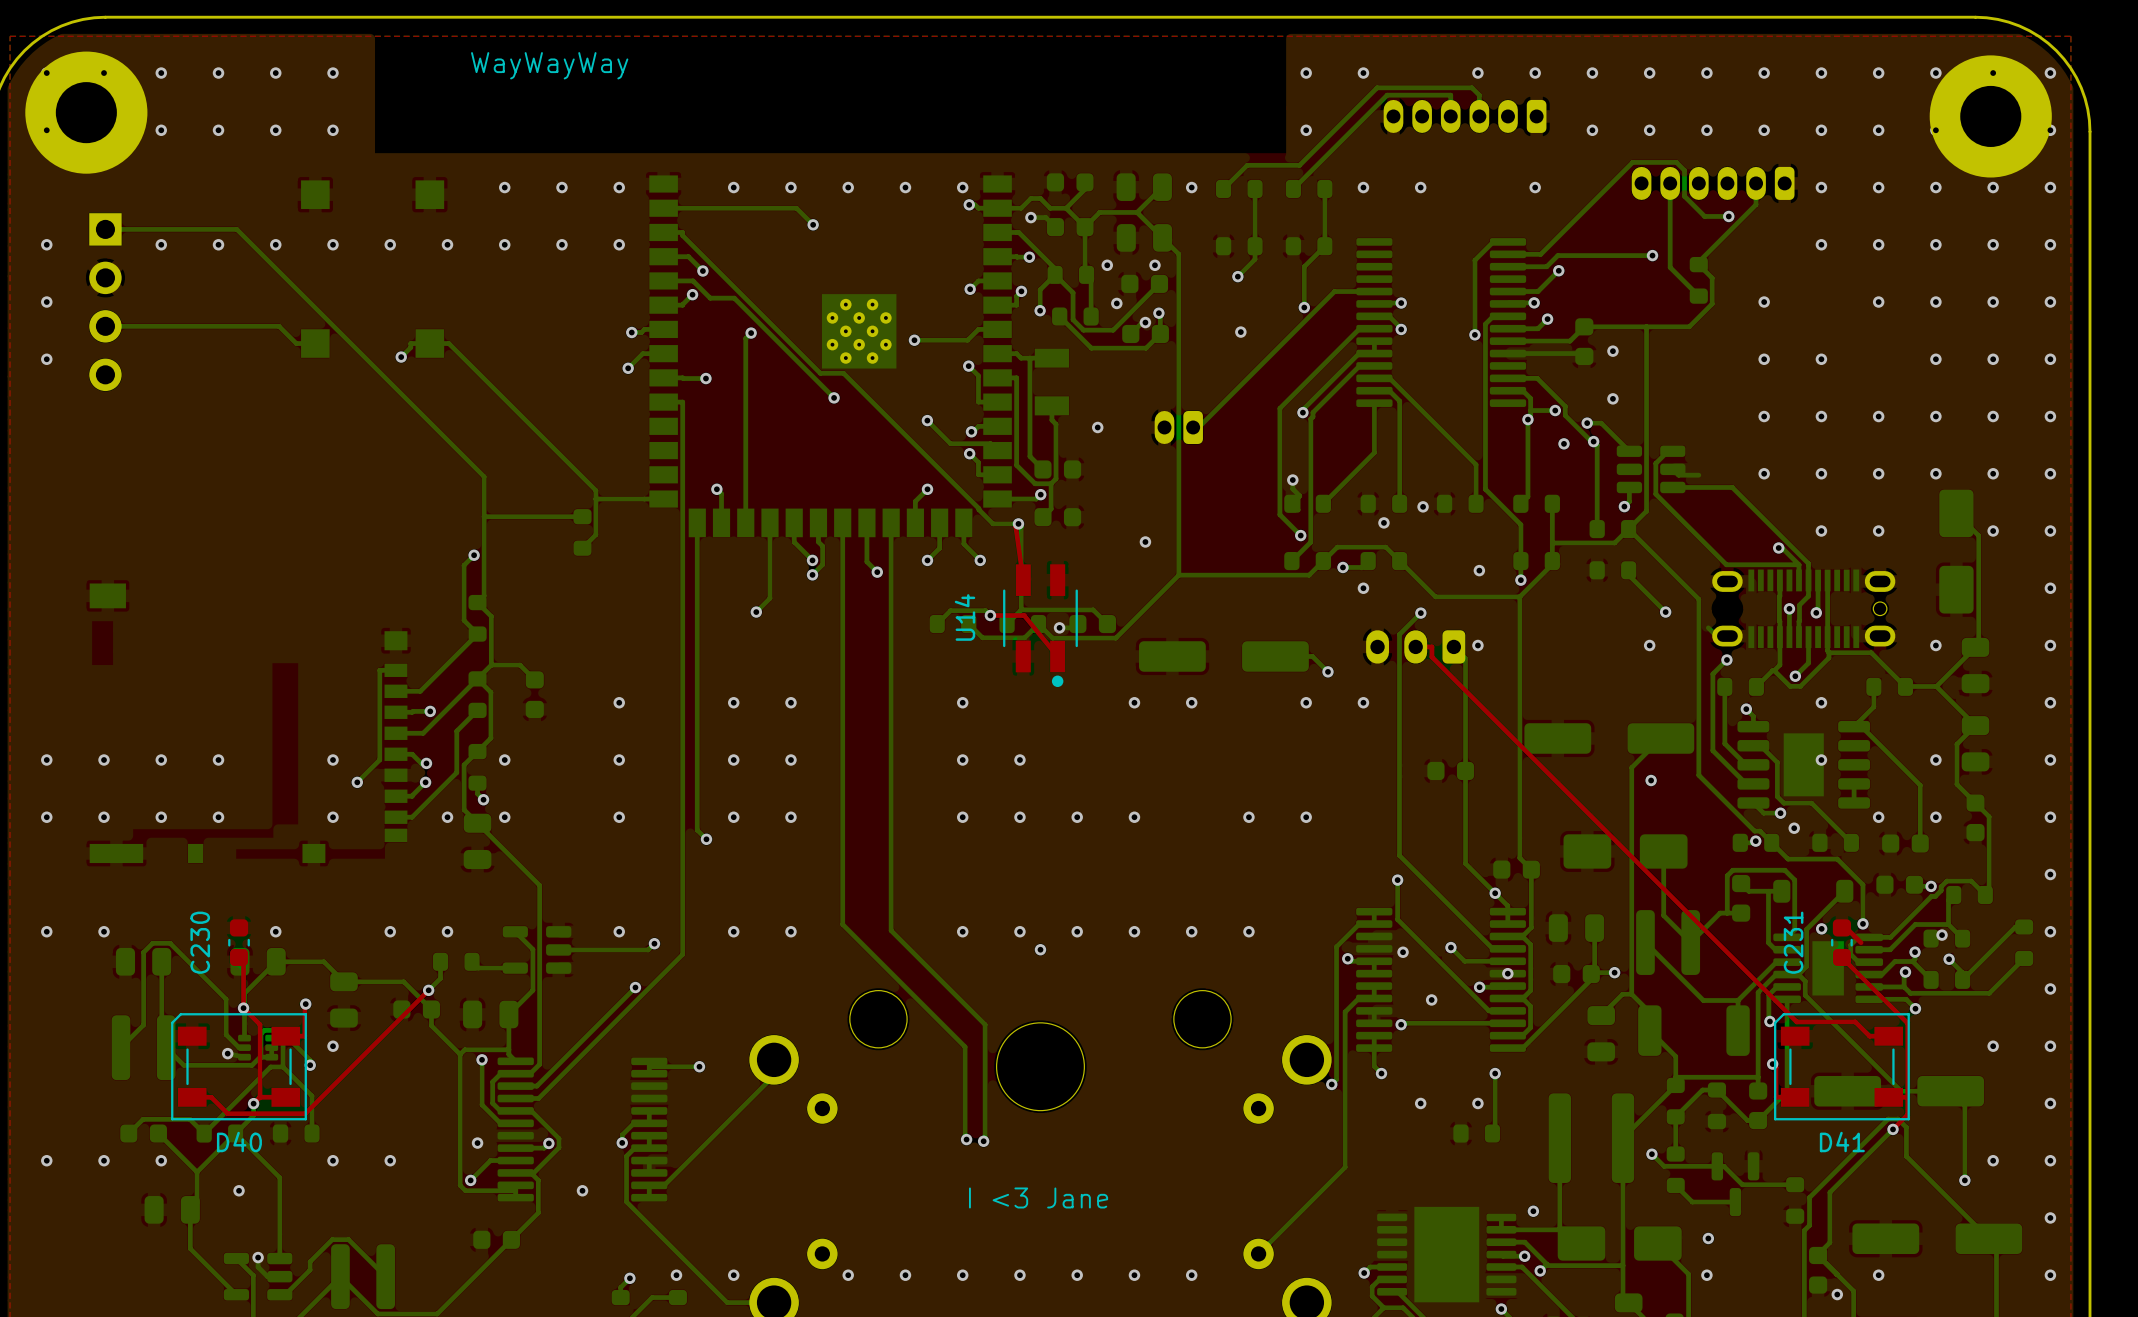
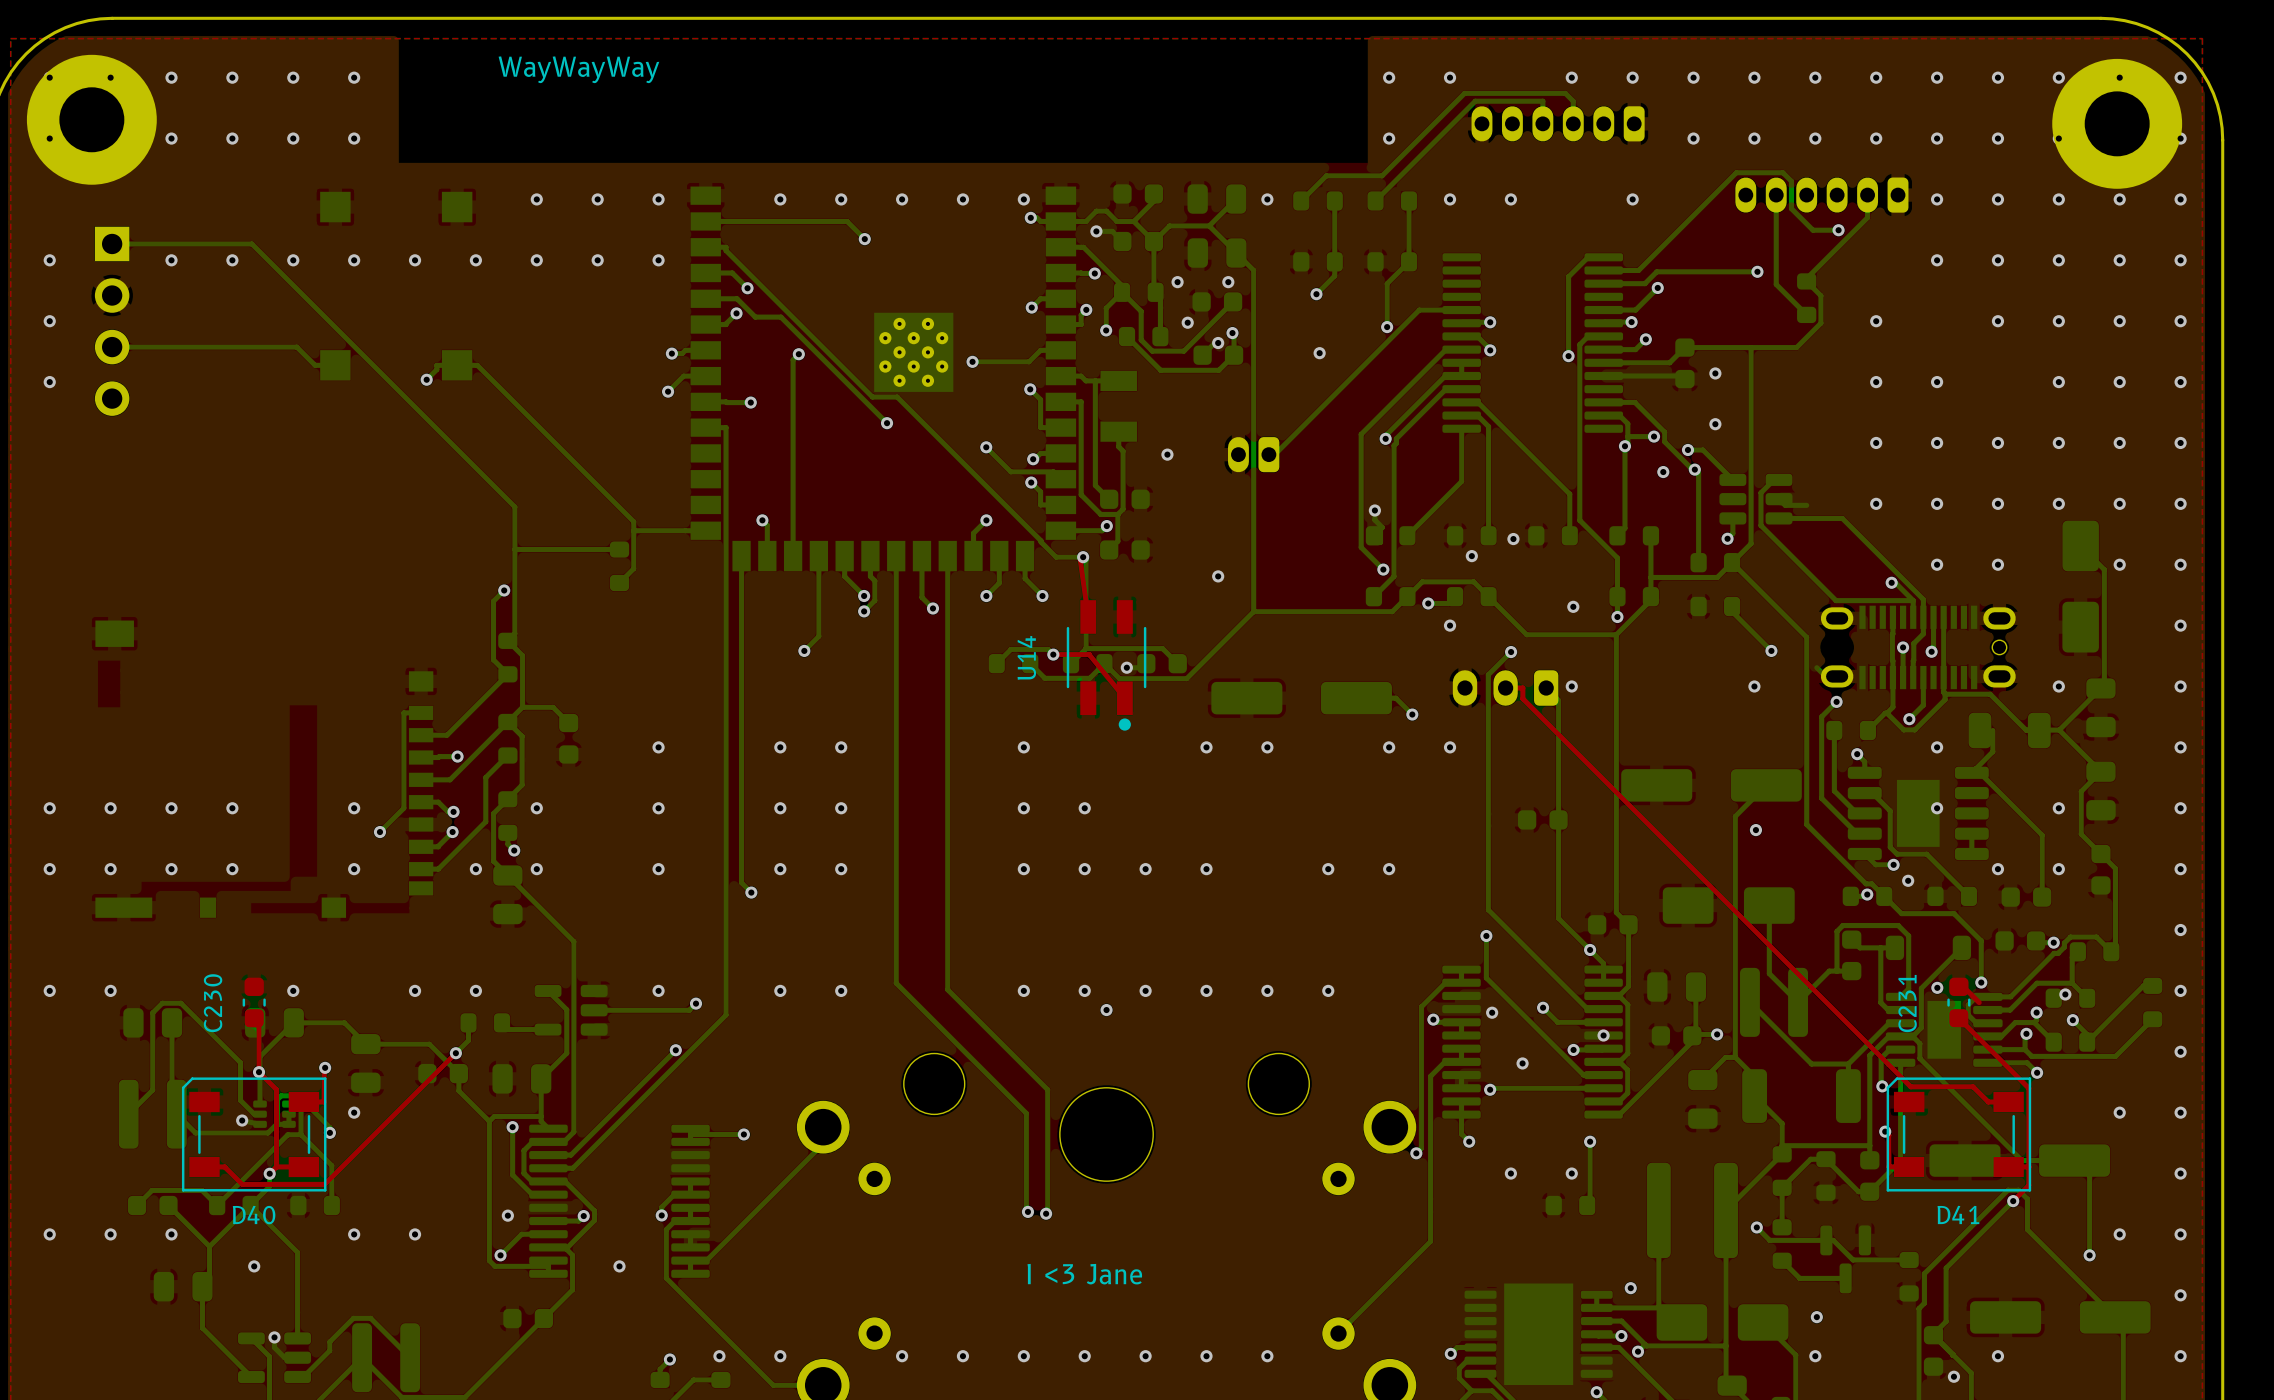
part footprint: [1866, 677, 1914, 696] -> [1968, 712, 2051, 749]

